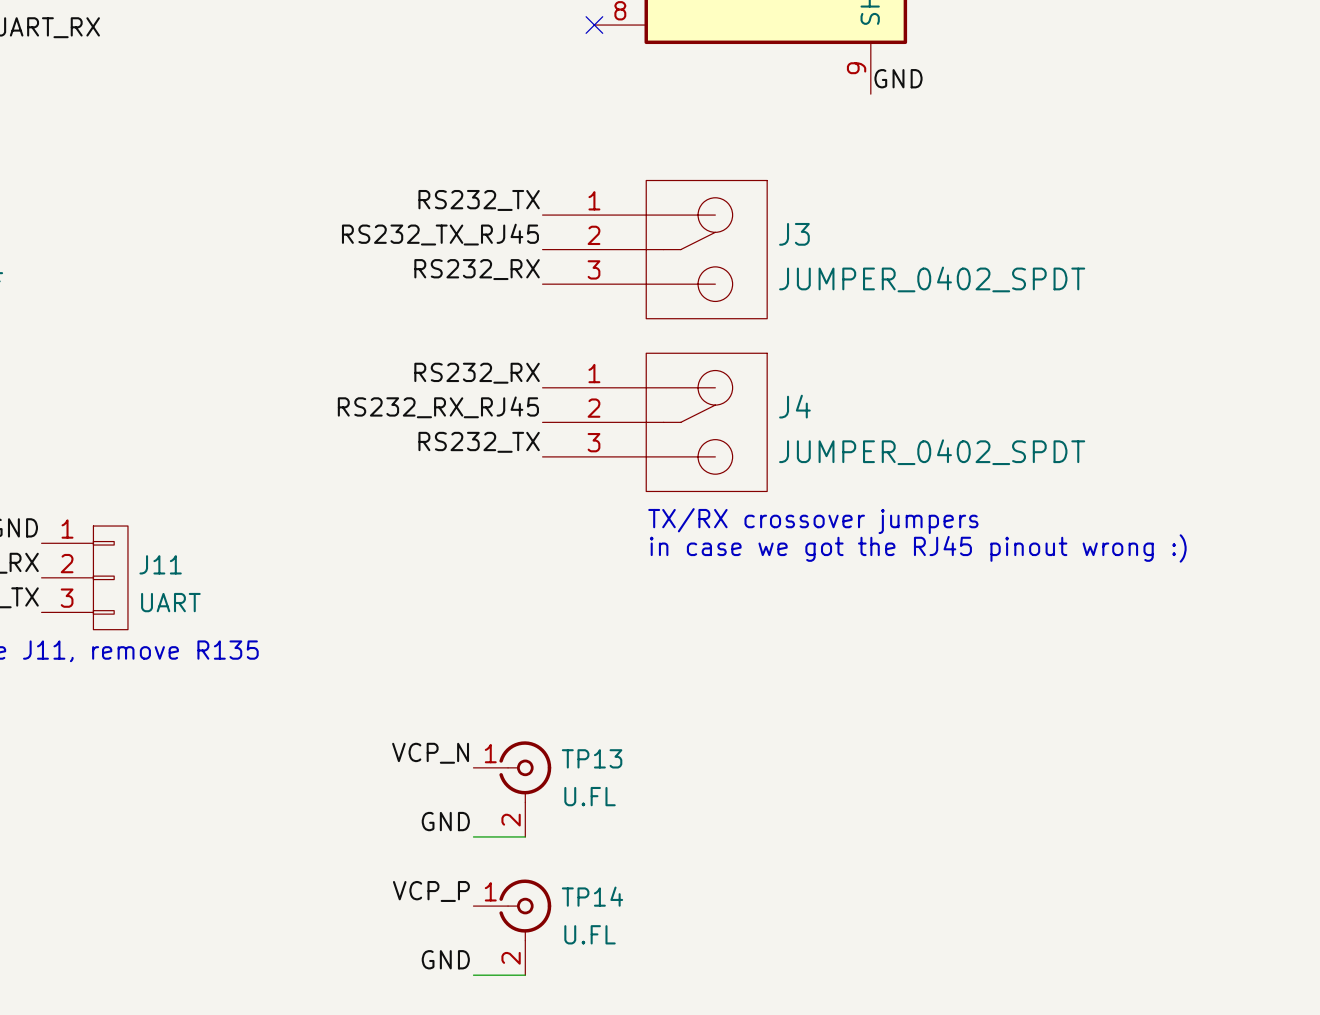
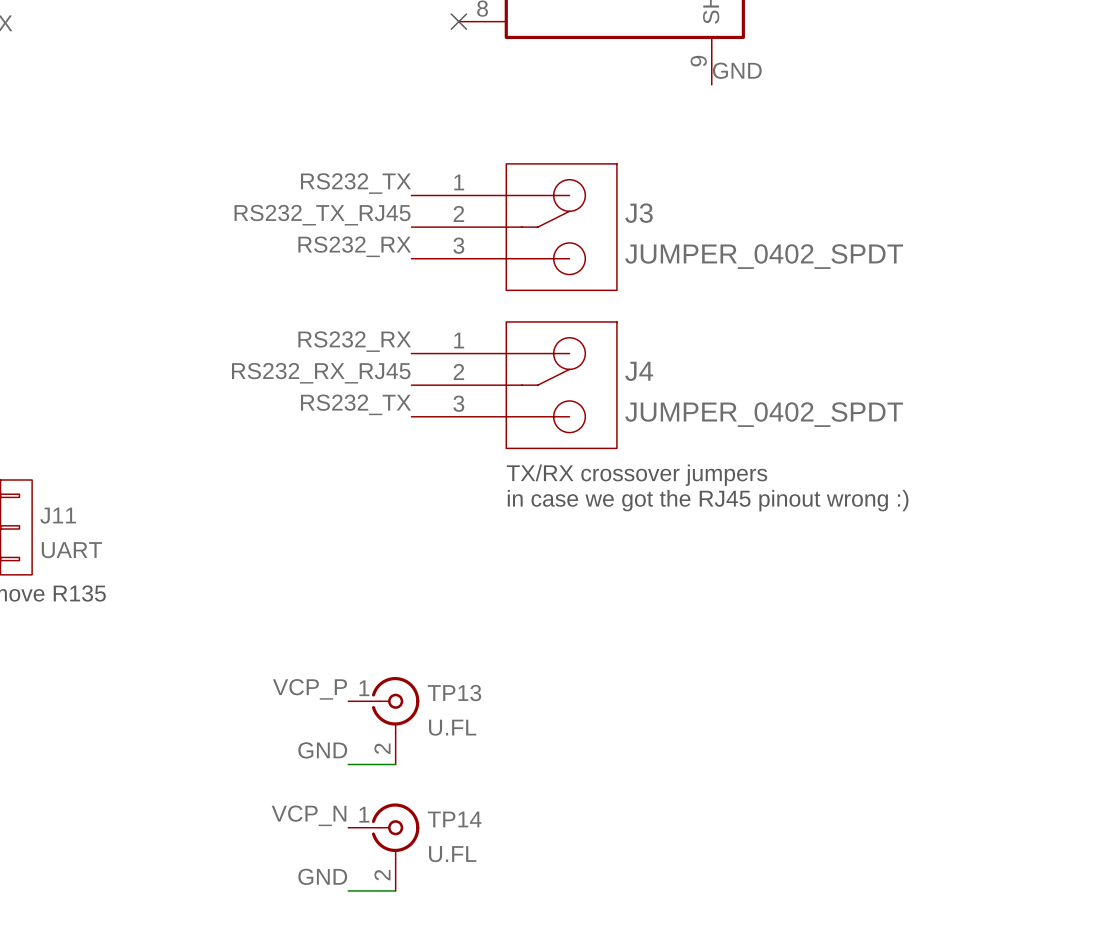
label: VCP_N (430, 753) -> VCP_P (310, 689)
label: VCP_P (431, 891) -> VCP_N (309, 815)

